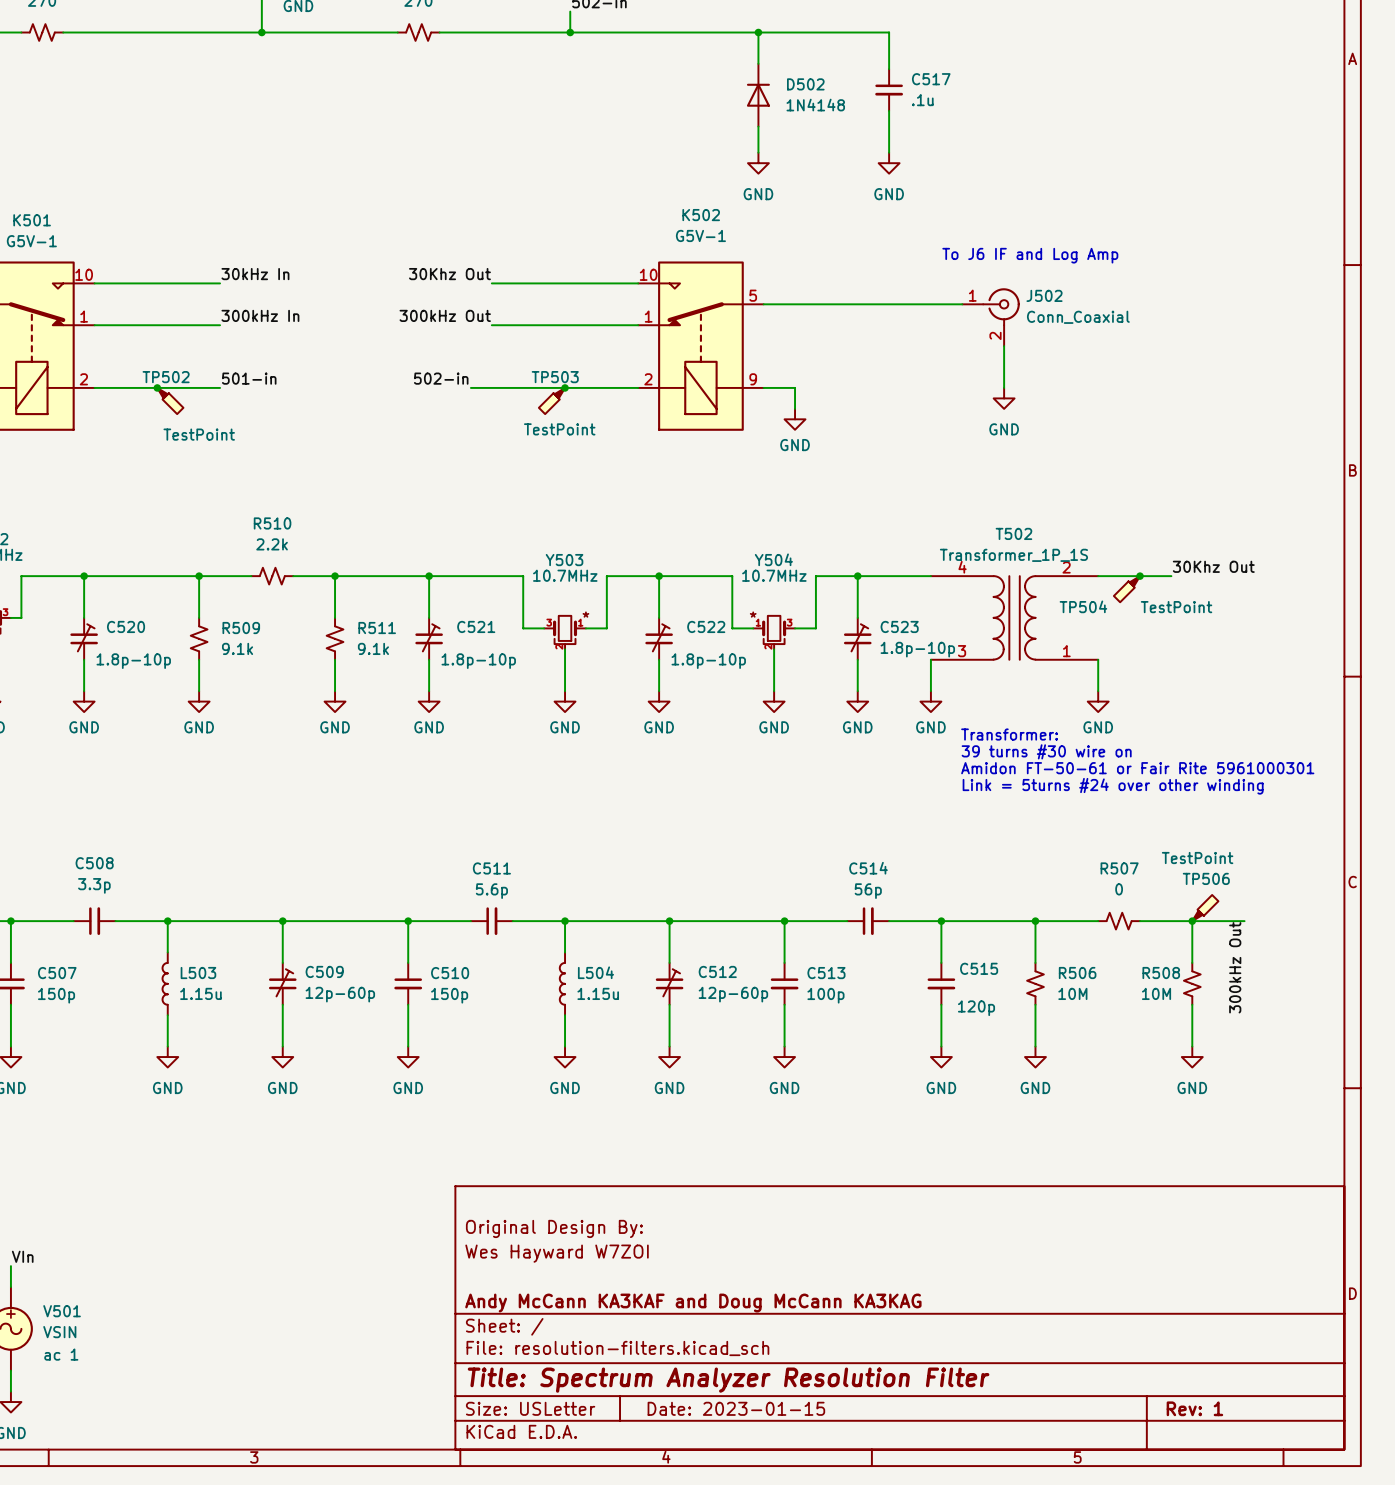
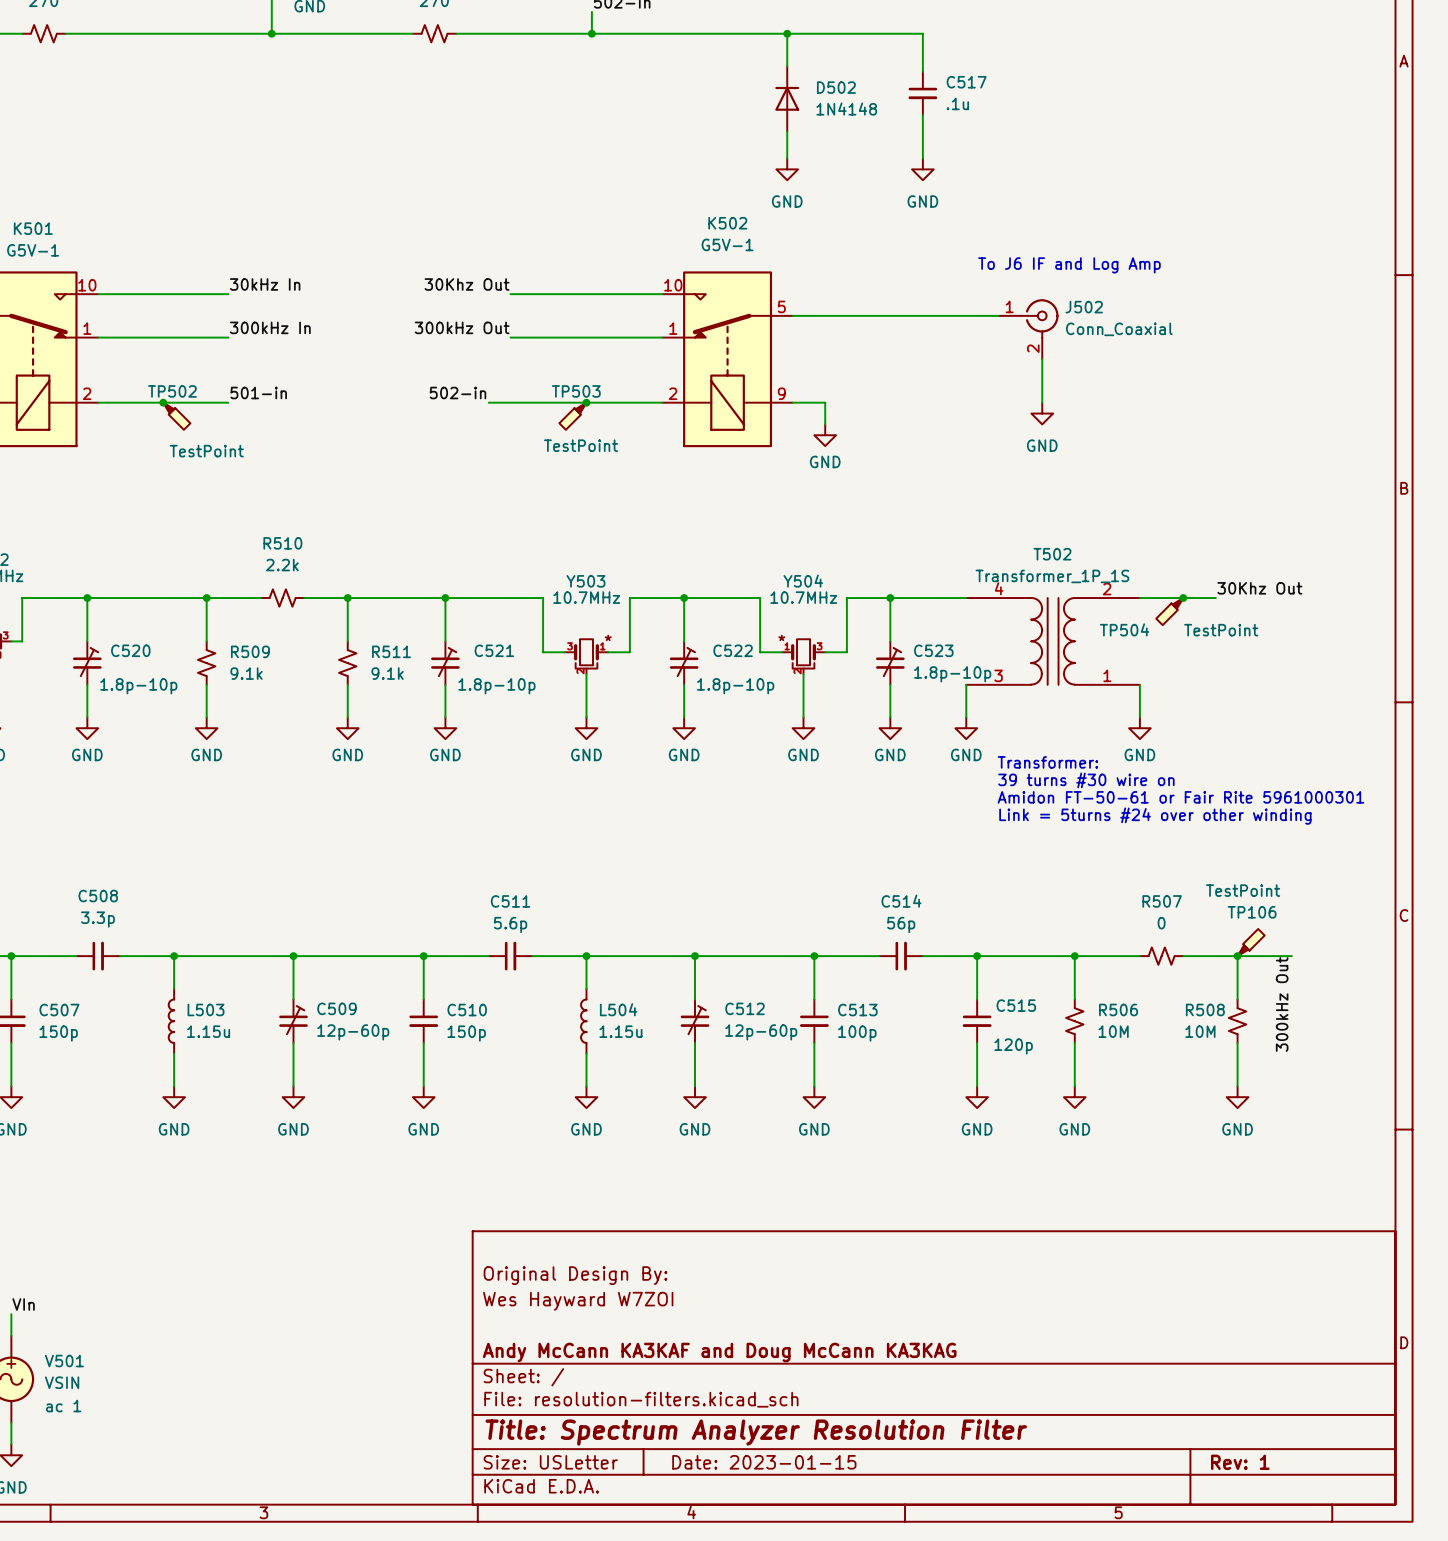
TP506 name: TP506 (1206, 878) -> TP106 (1252, 912)

